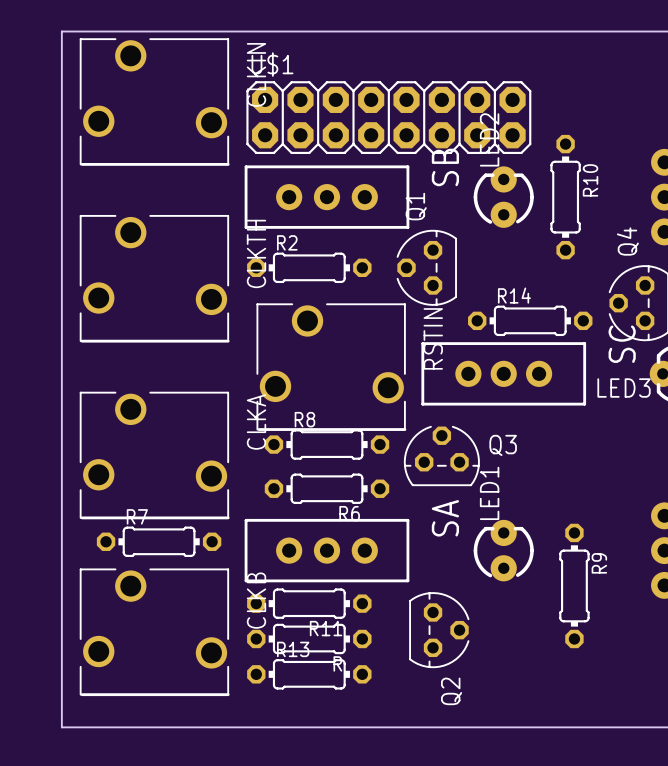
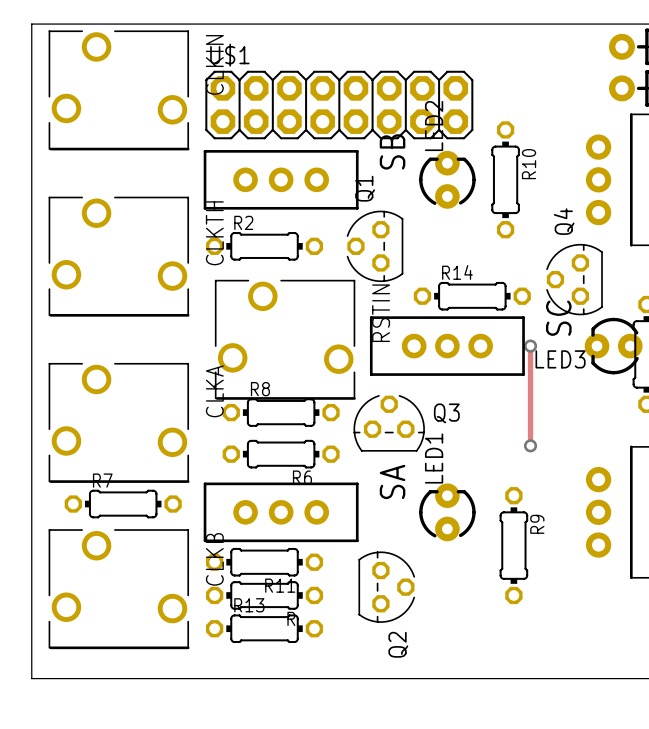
track: none -> (530, 346) (530, 445)
via: none -> (530, 346)
via: none -> (530, 445)

